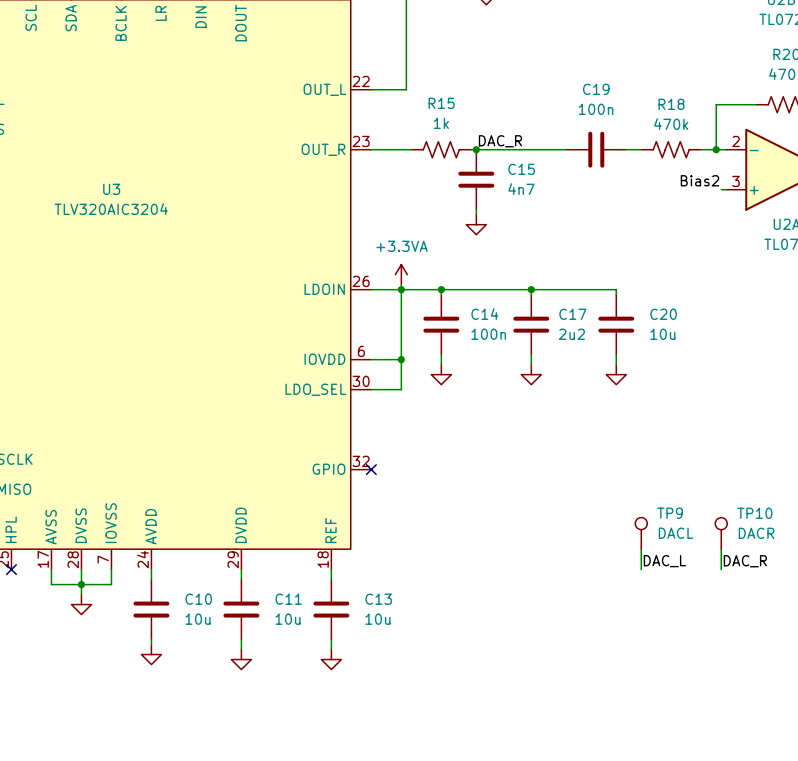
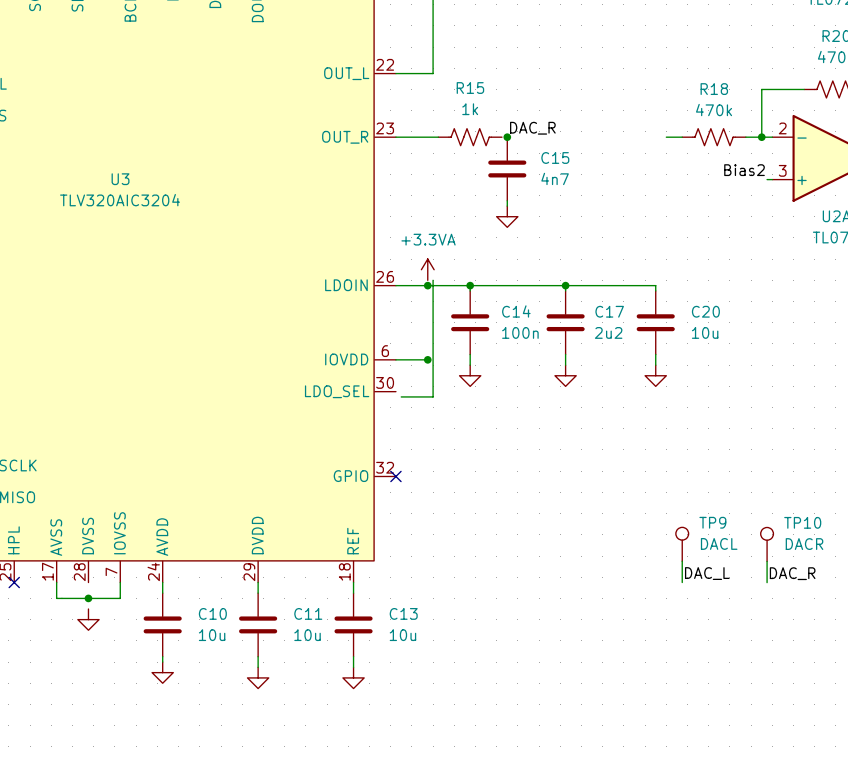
wire: (471, 149) (566, 149) -> none
C19: 100n (596, 149) -> none
wire: (401, 284) (401, 389) (371, 389) -> none
wire: none -> (433, 280) (433, 396) (401, 396)
wire: (81, 569) (81, 594) -> none

